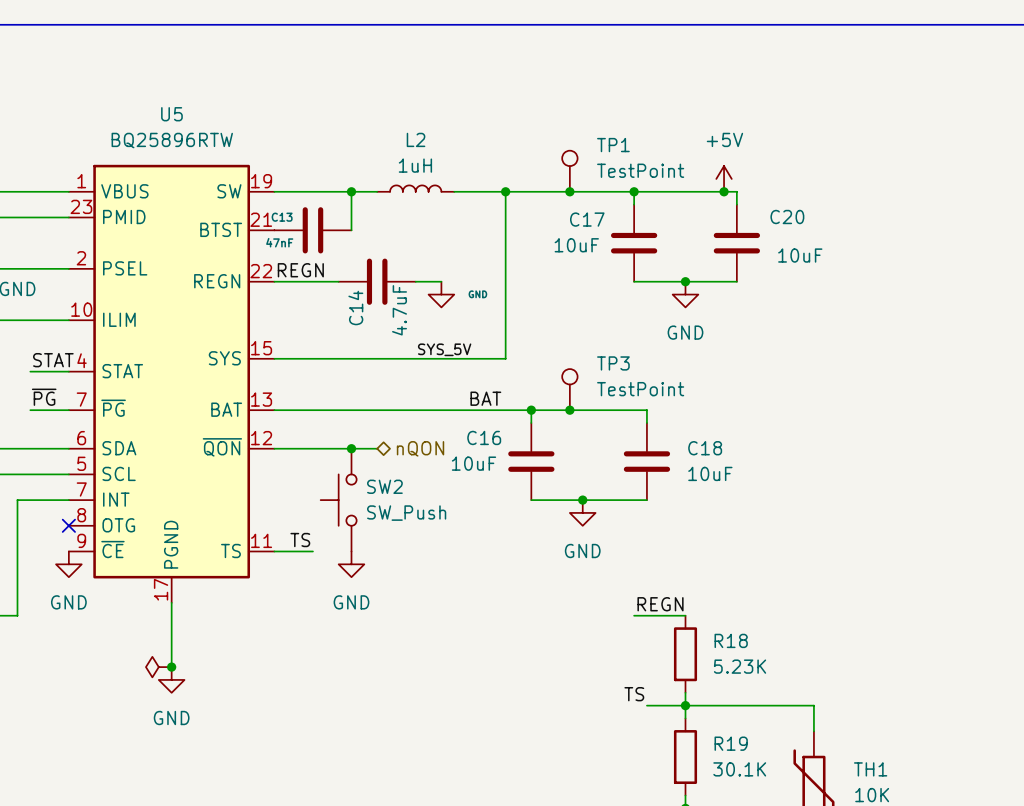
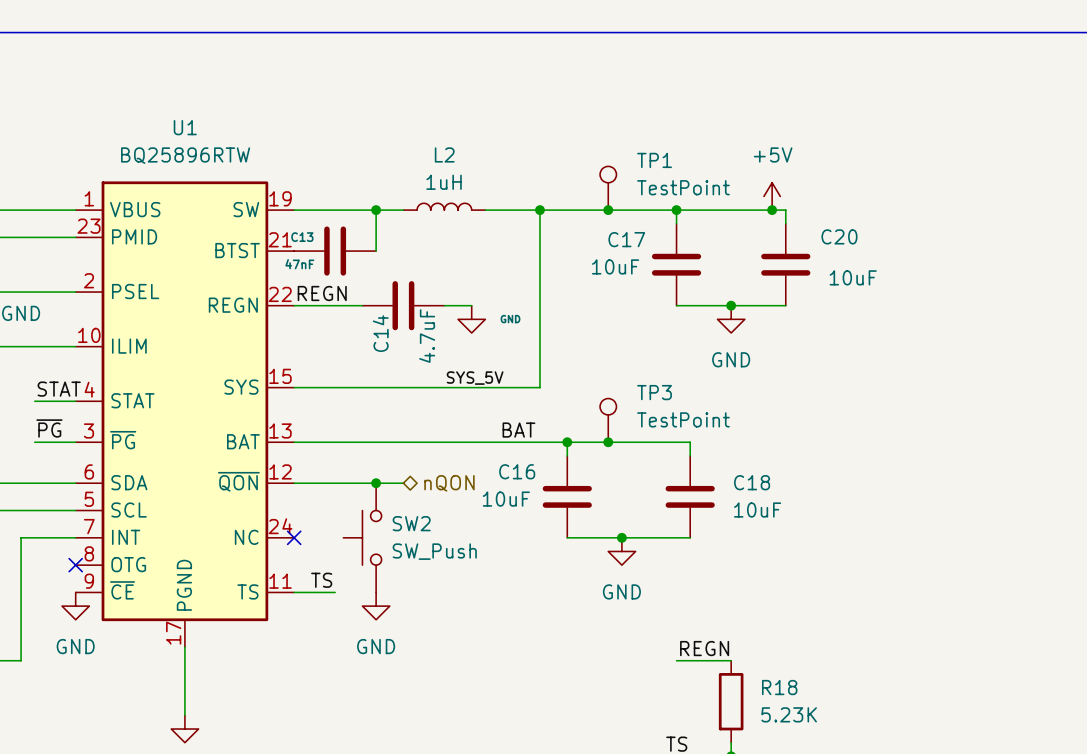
U5: BQ25896RTW (171, 383) -> none
U1: none -> BQ25896RTW (184, 414)
no-connect mark: none -> (294, 537)
power symbol: (158, 667) -> none
junction: (171, 667) -> none

